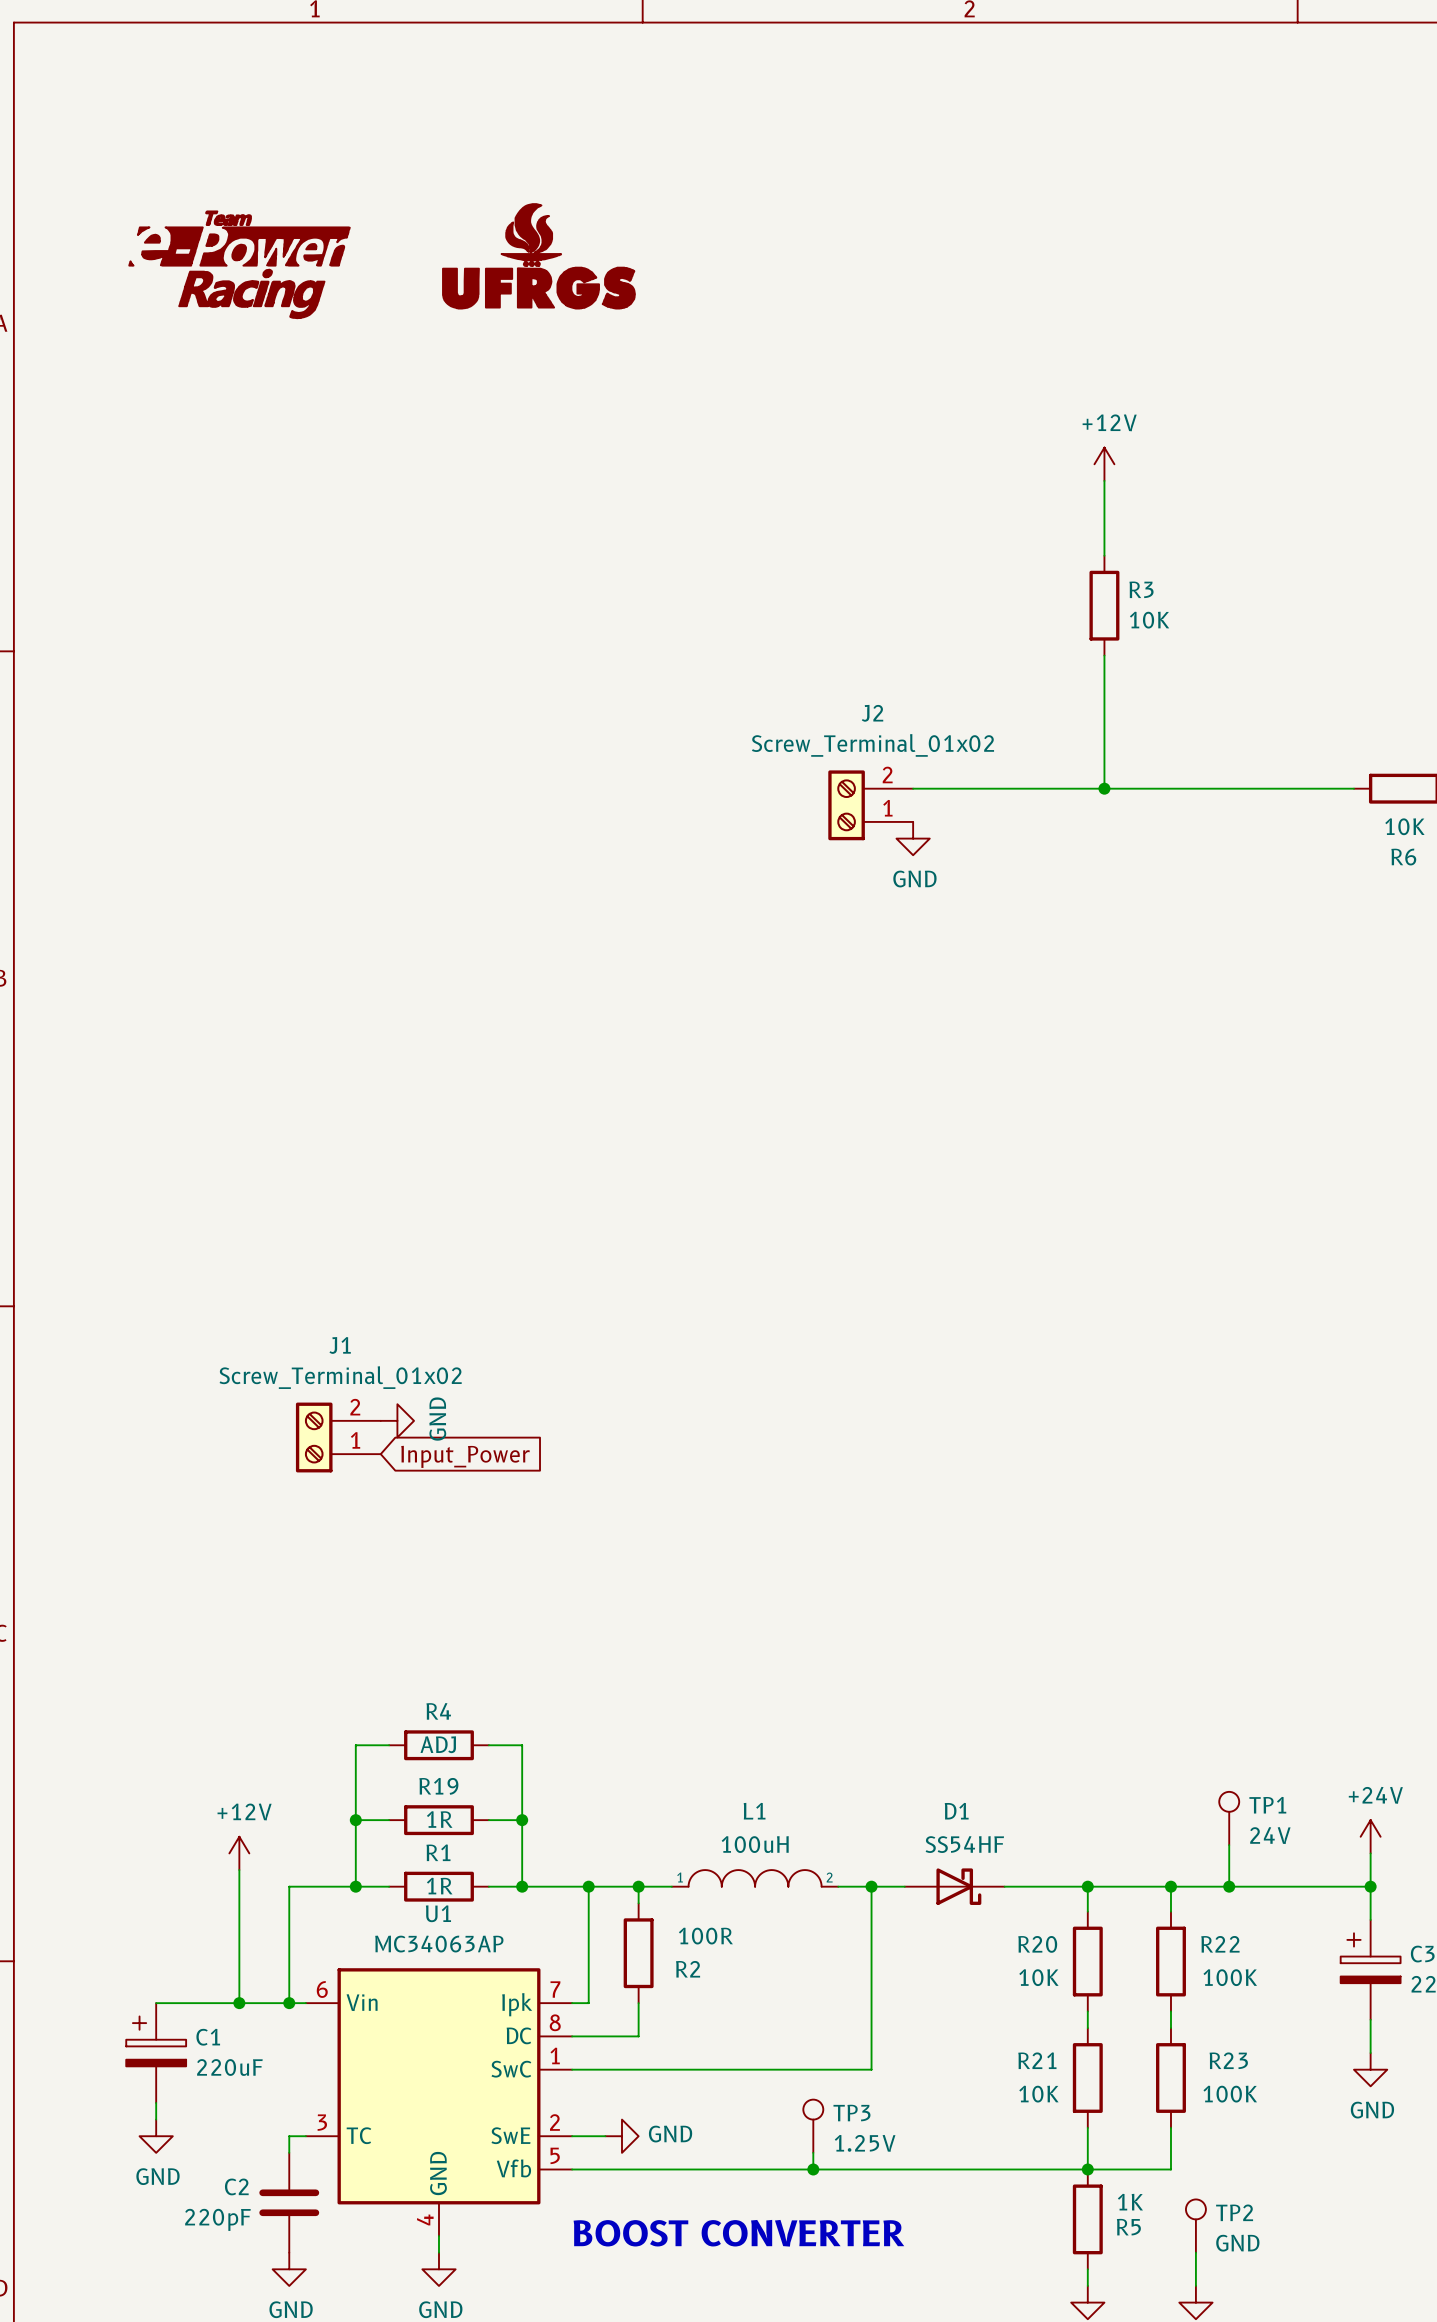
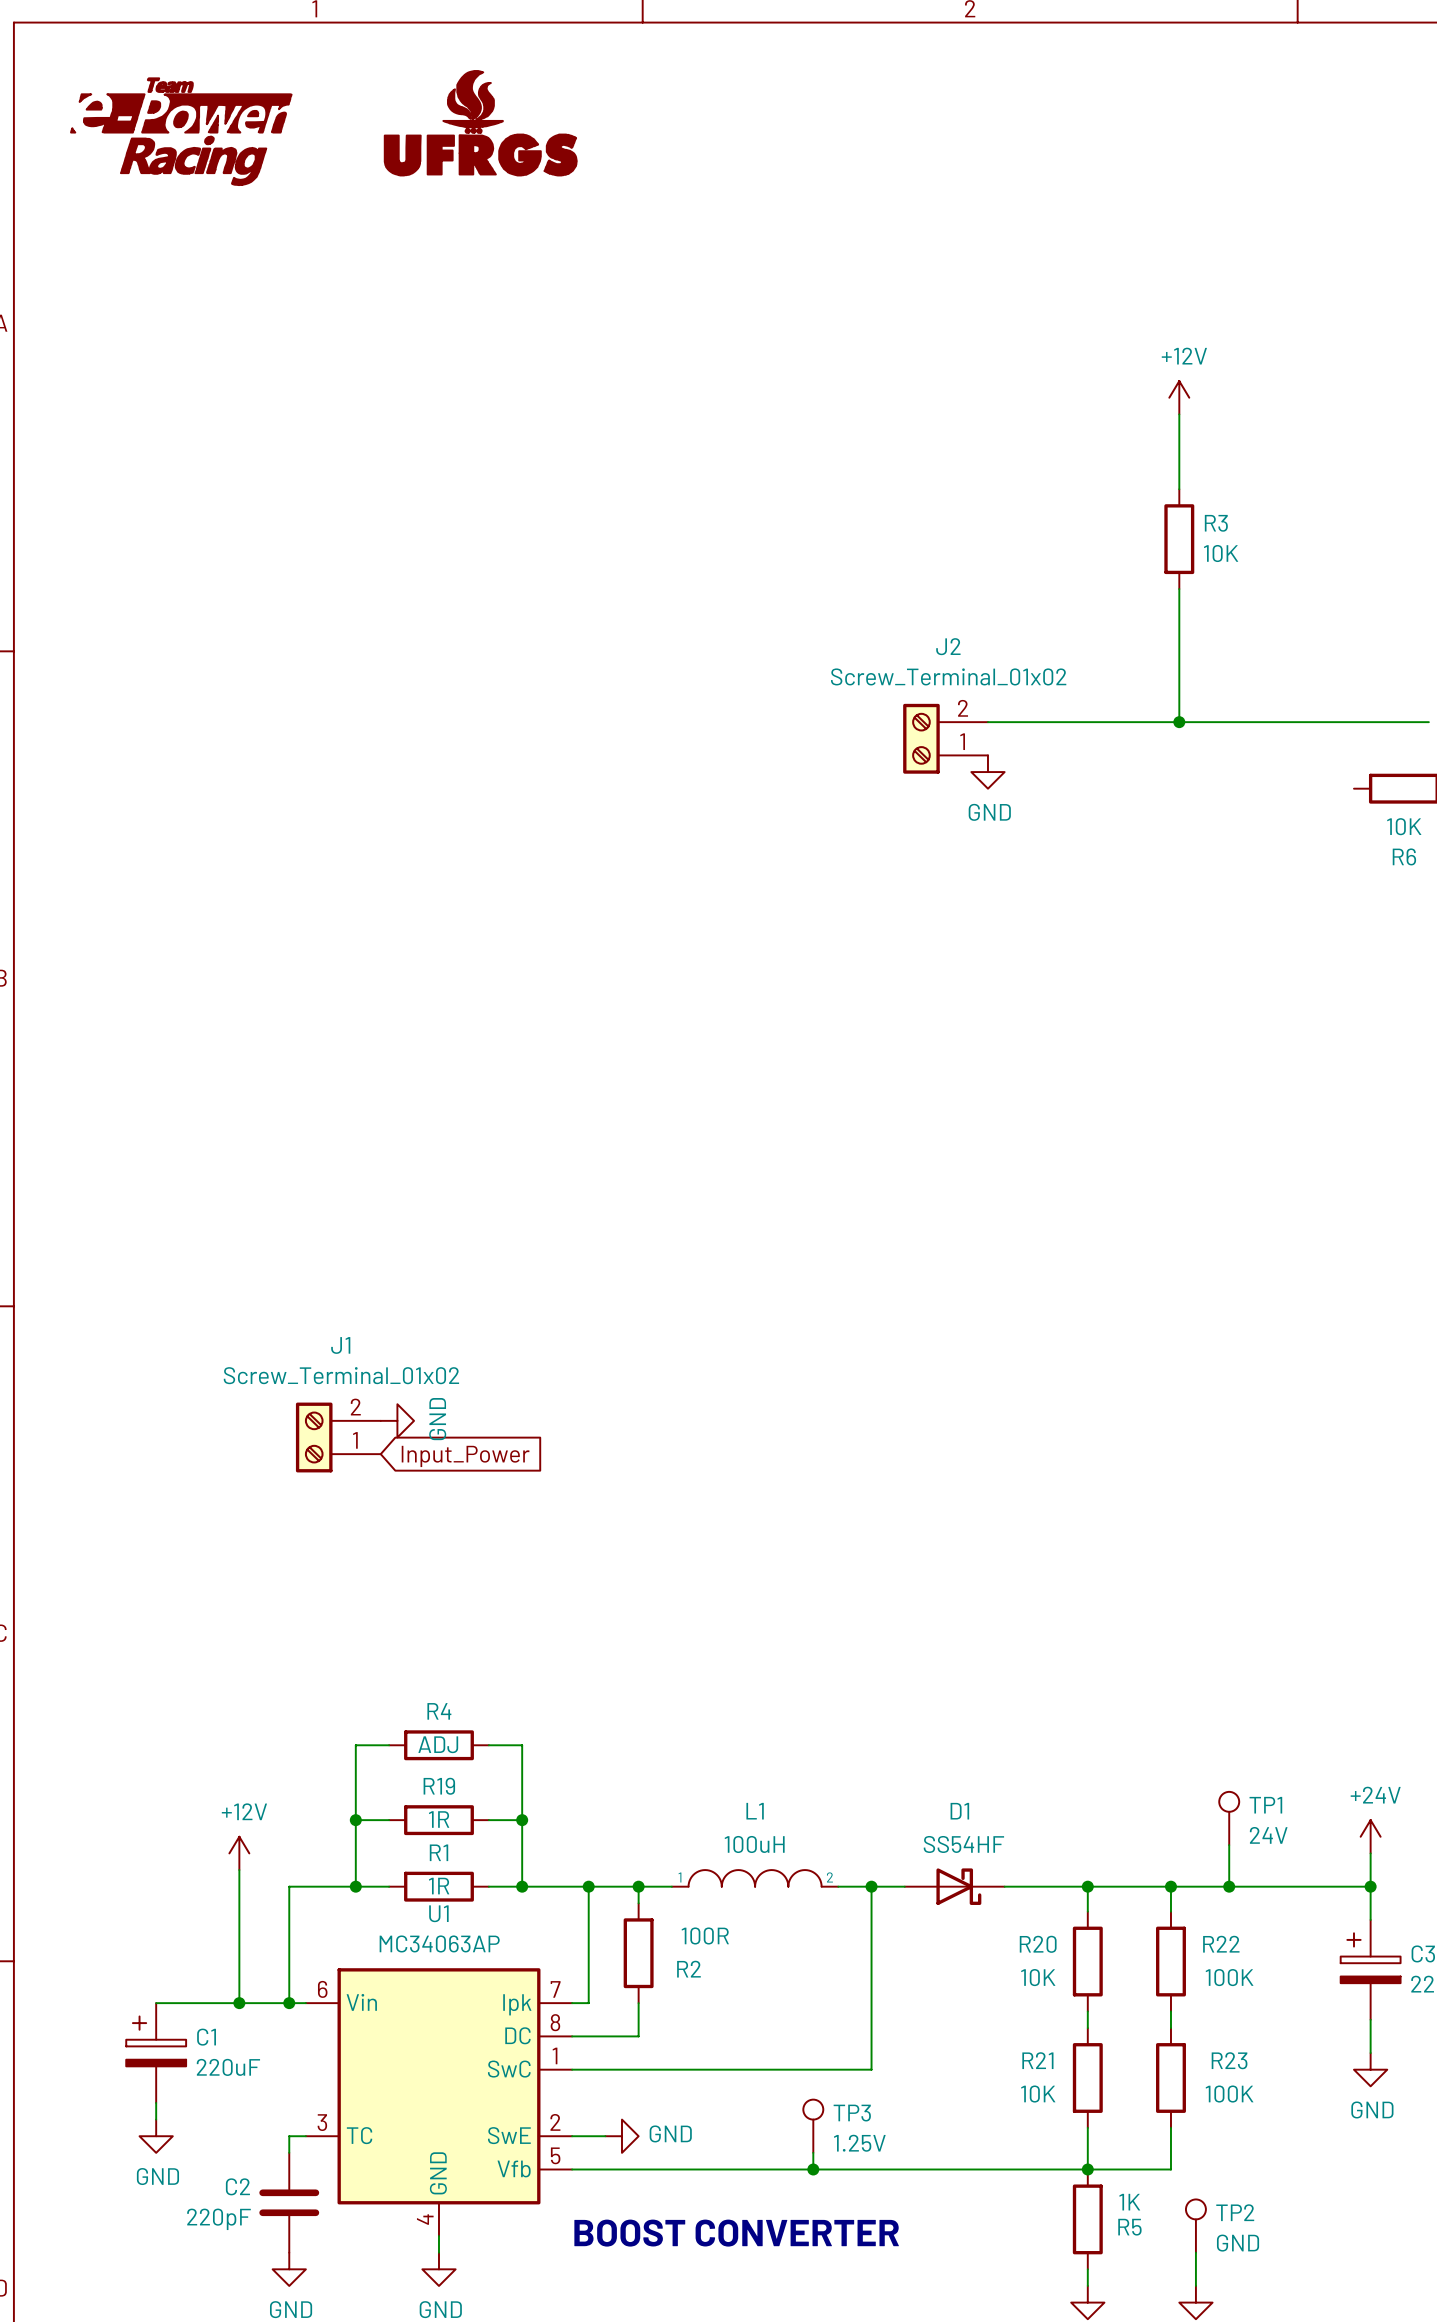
part position: (538, 256) -> (480, 123)
part position: (239, 264) -> (181, 131)
power symbol position: +12V (1104, 464) -> +12V (1179, 397)
wire: (1104, 480) (1104, 555) -> (1179, 414) (1179, 489)
R3 position: (1104, 605) -> (1179, 539)
wire: (1104, 655) (1104, 788) -> (1179, 589) (1179, 722)
junction: none -> (1179, 722)
wire: (913, 788) (1353, 788) -> (987, 722) (1428, 722)
junction: (1104, 788) -> none
J2 position: (870, 805) -> (945, 738)
power symbol position: GND (913, 838) -> GND (987, 772)

